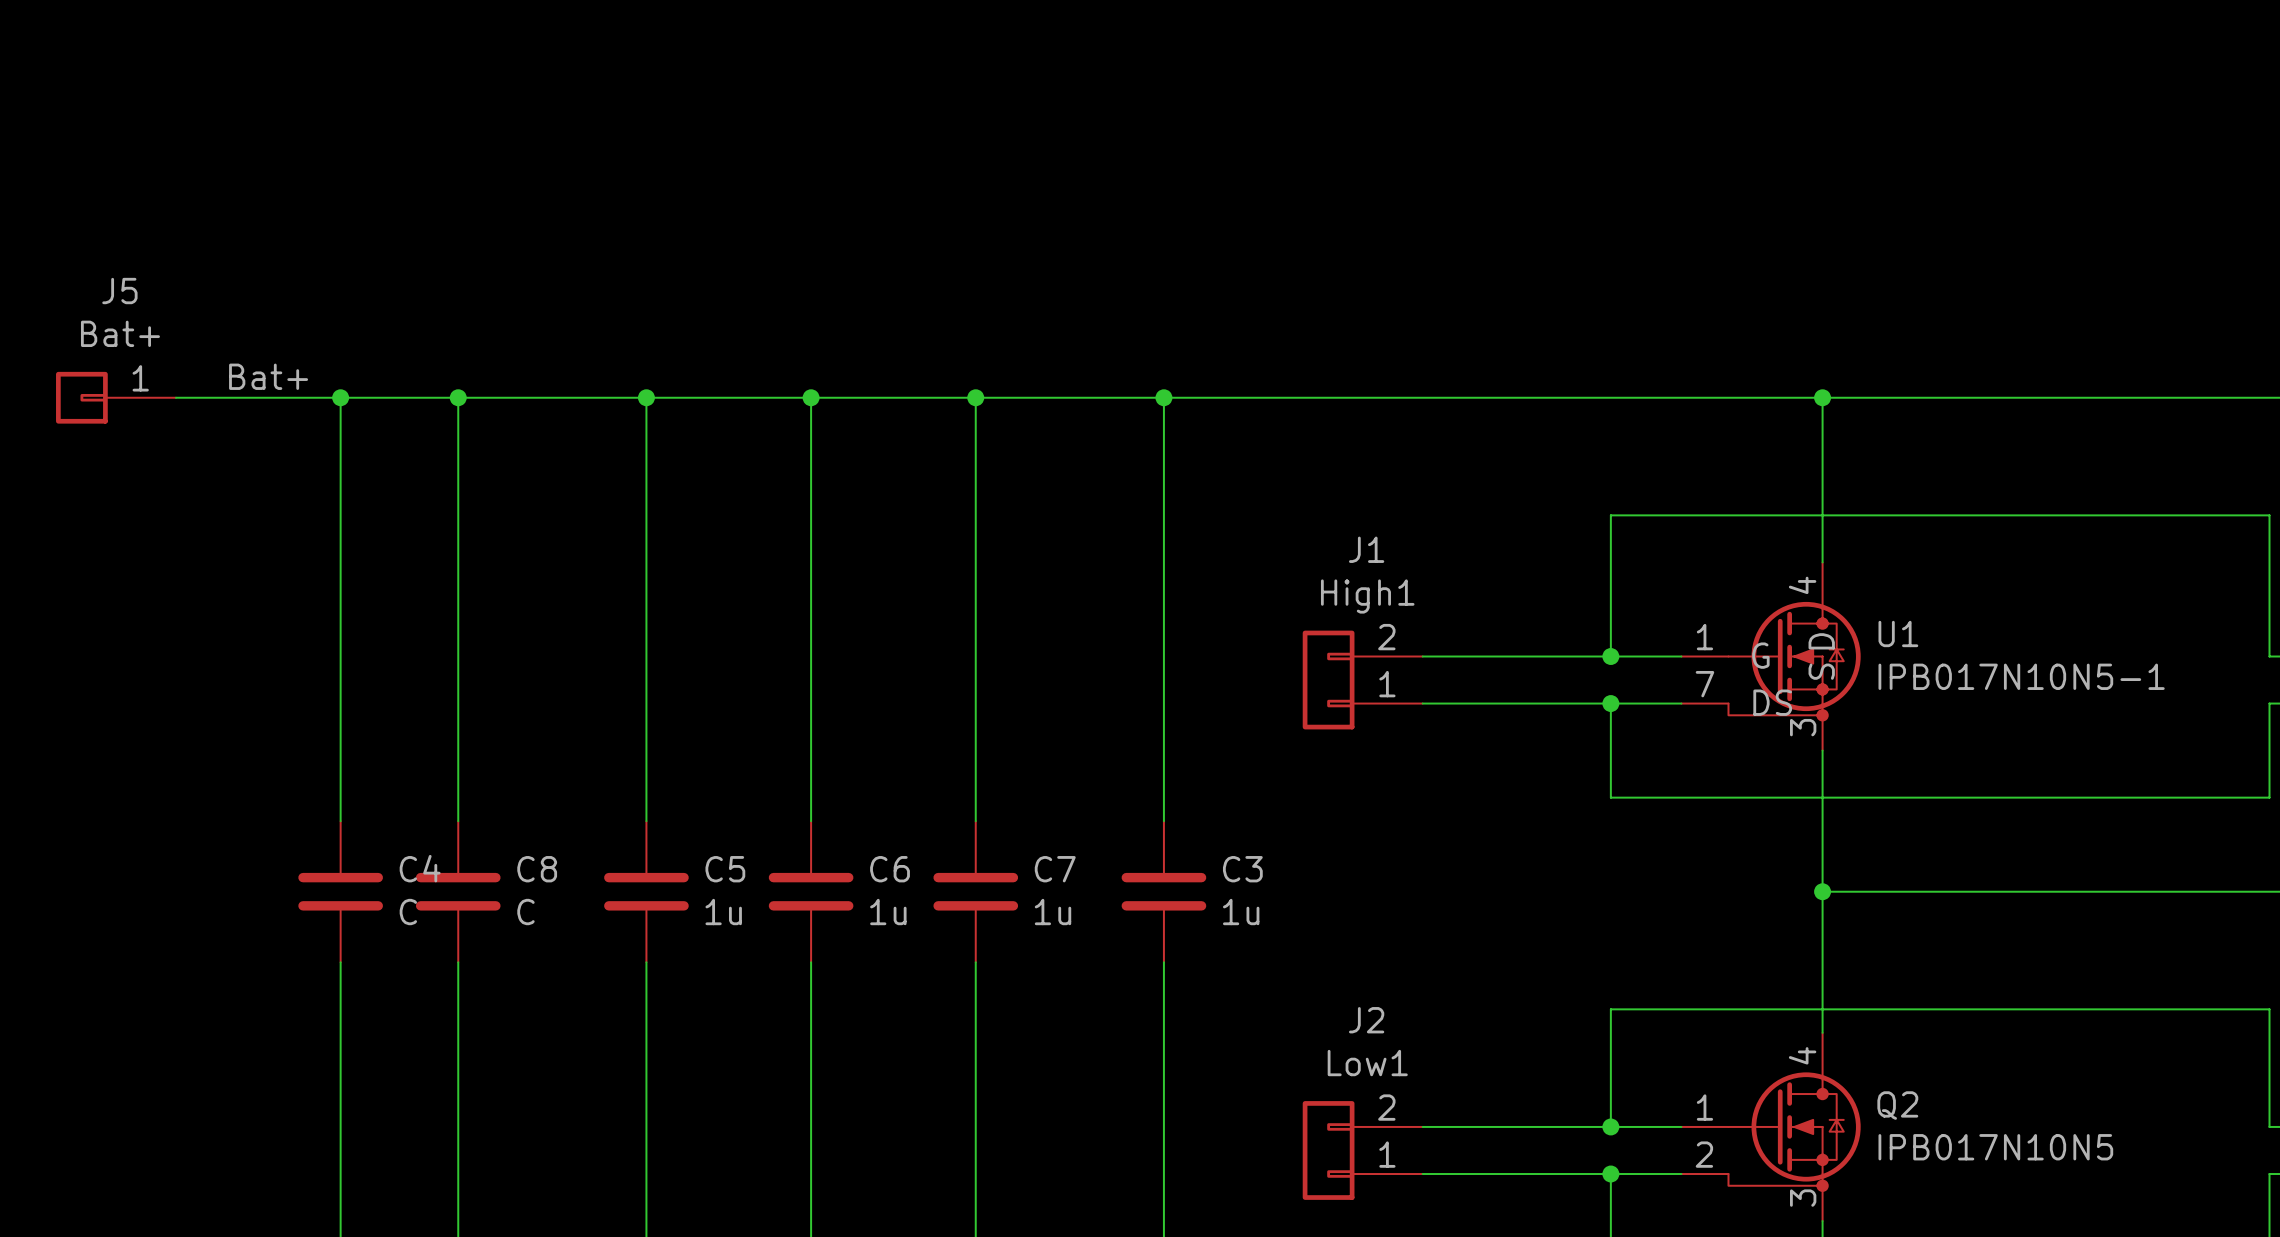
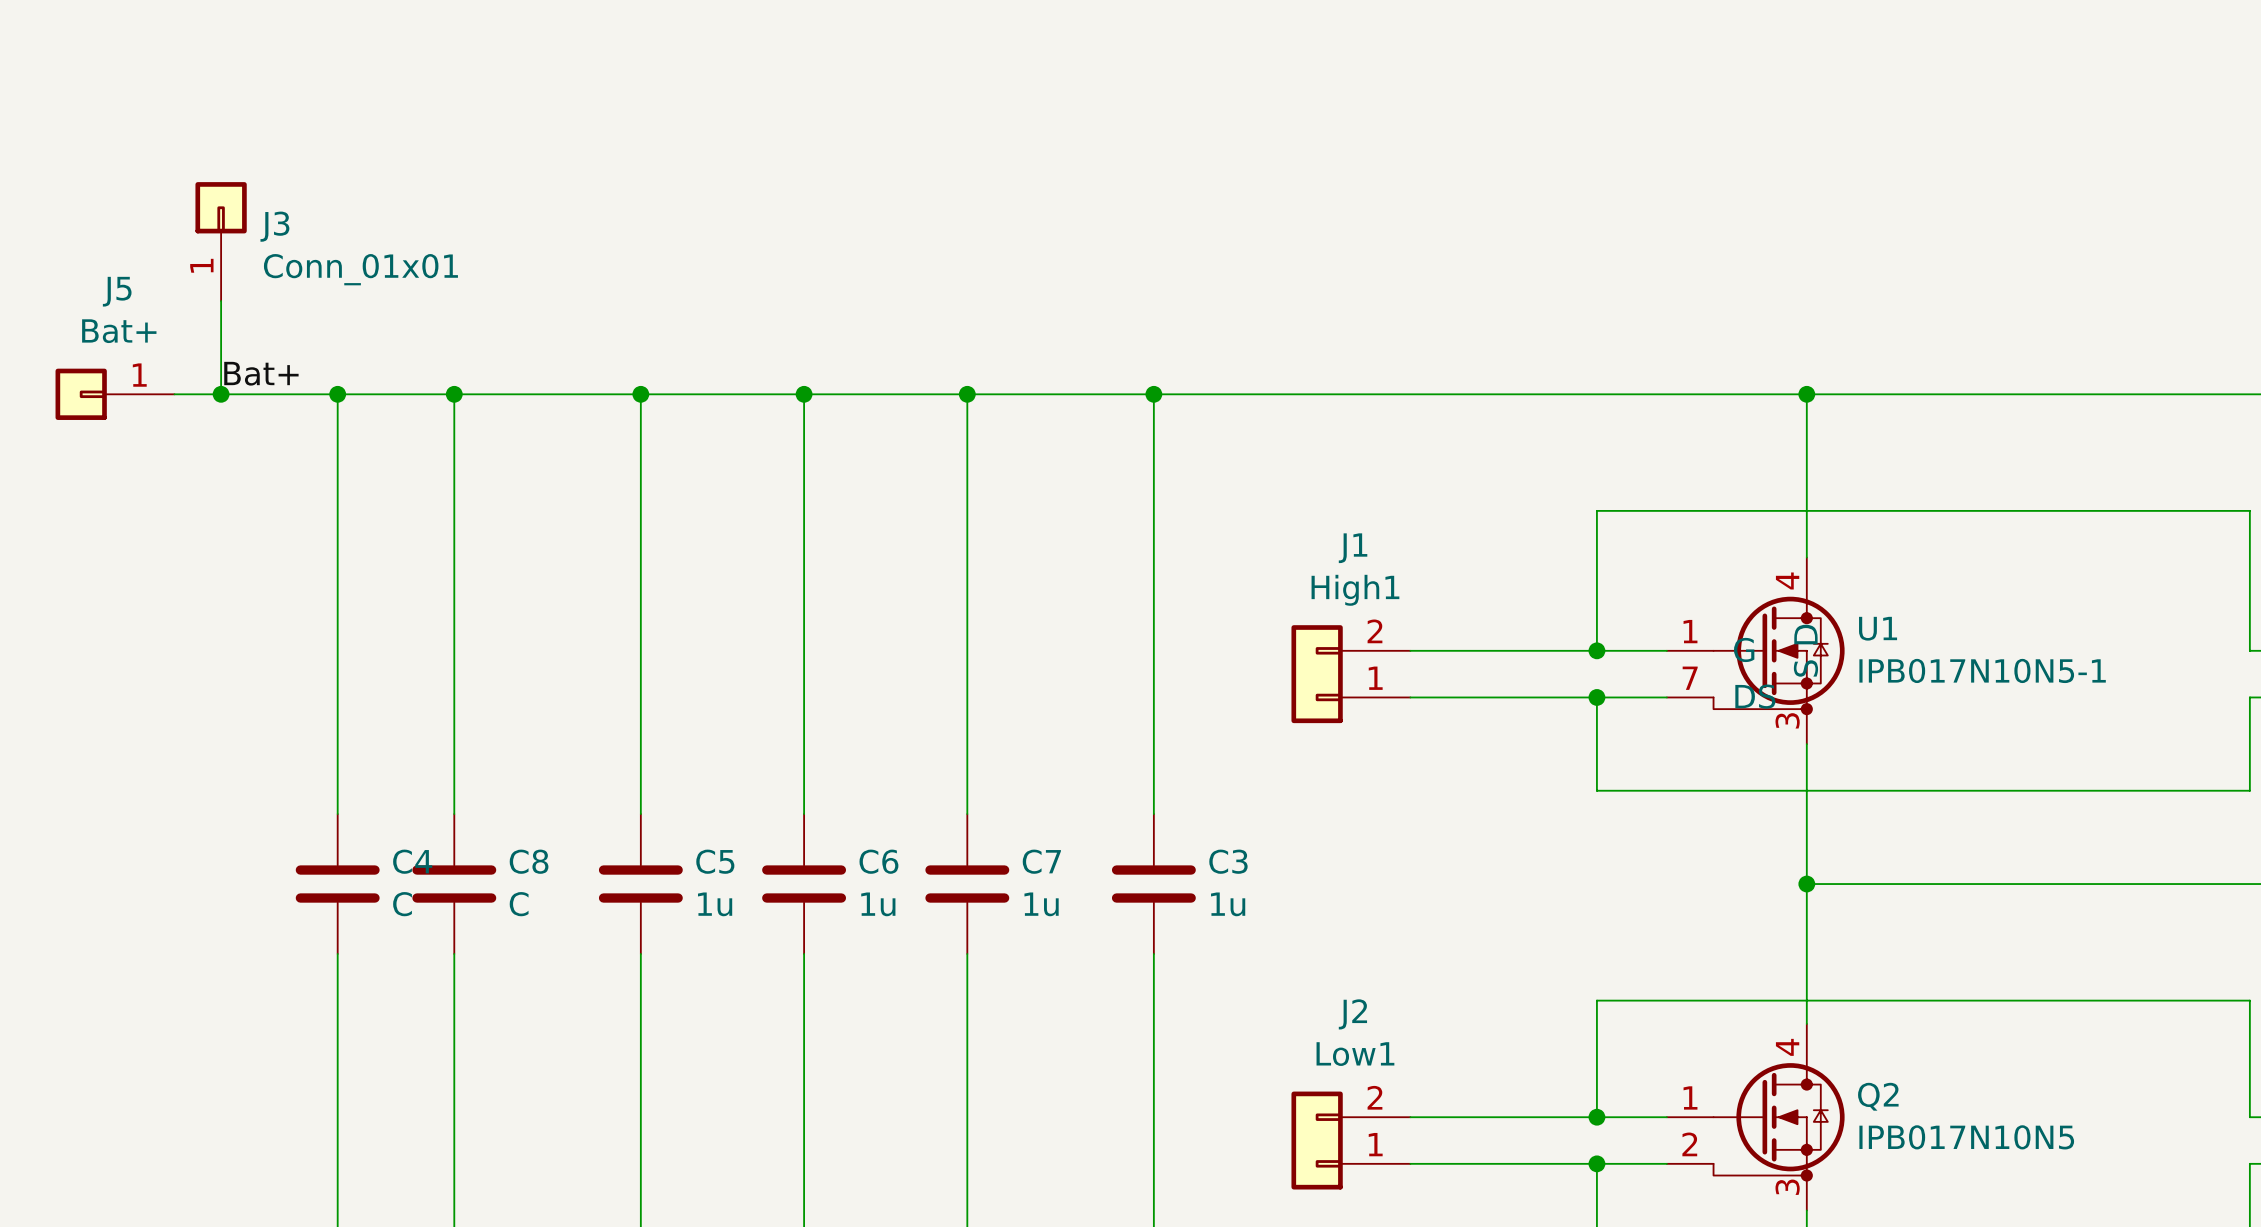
J3: none -> Conn_01x01 (221, 241)
wire: none -> (221, 301) (221, 394)
junction: none -> (221, 394)

